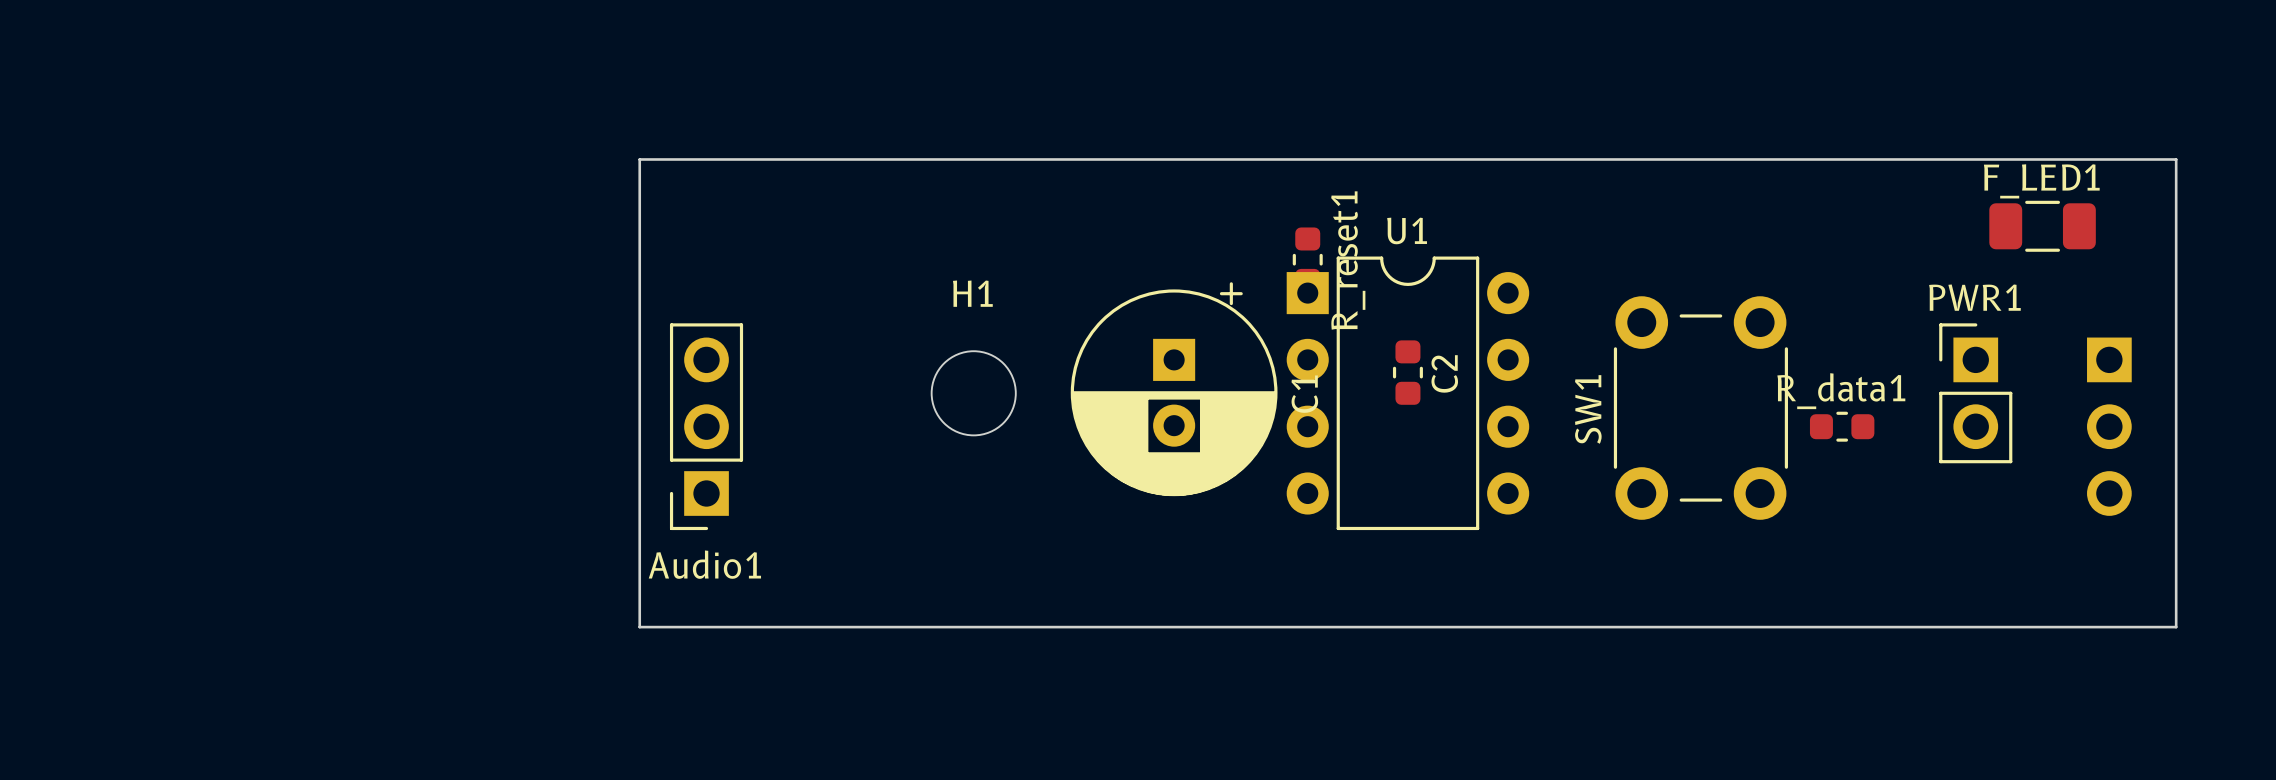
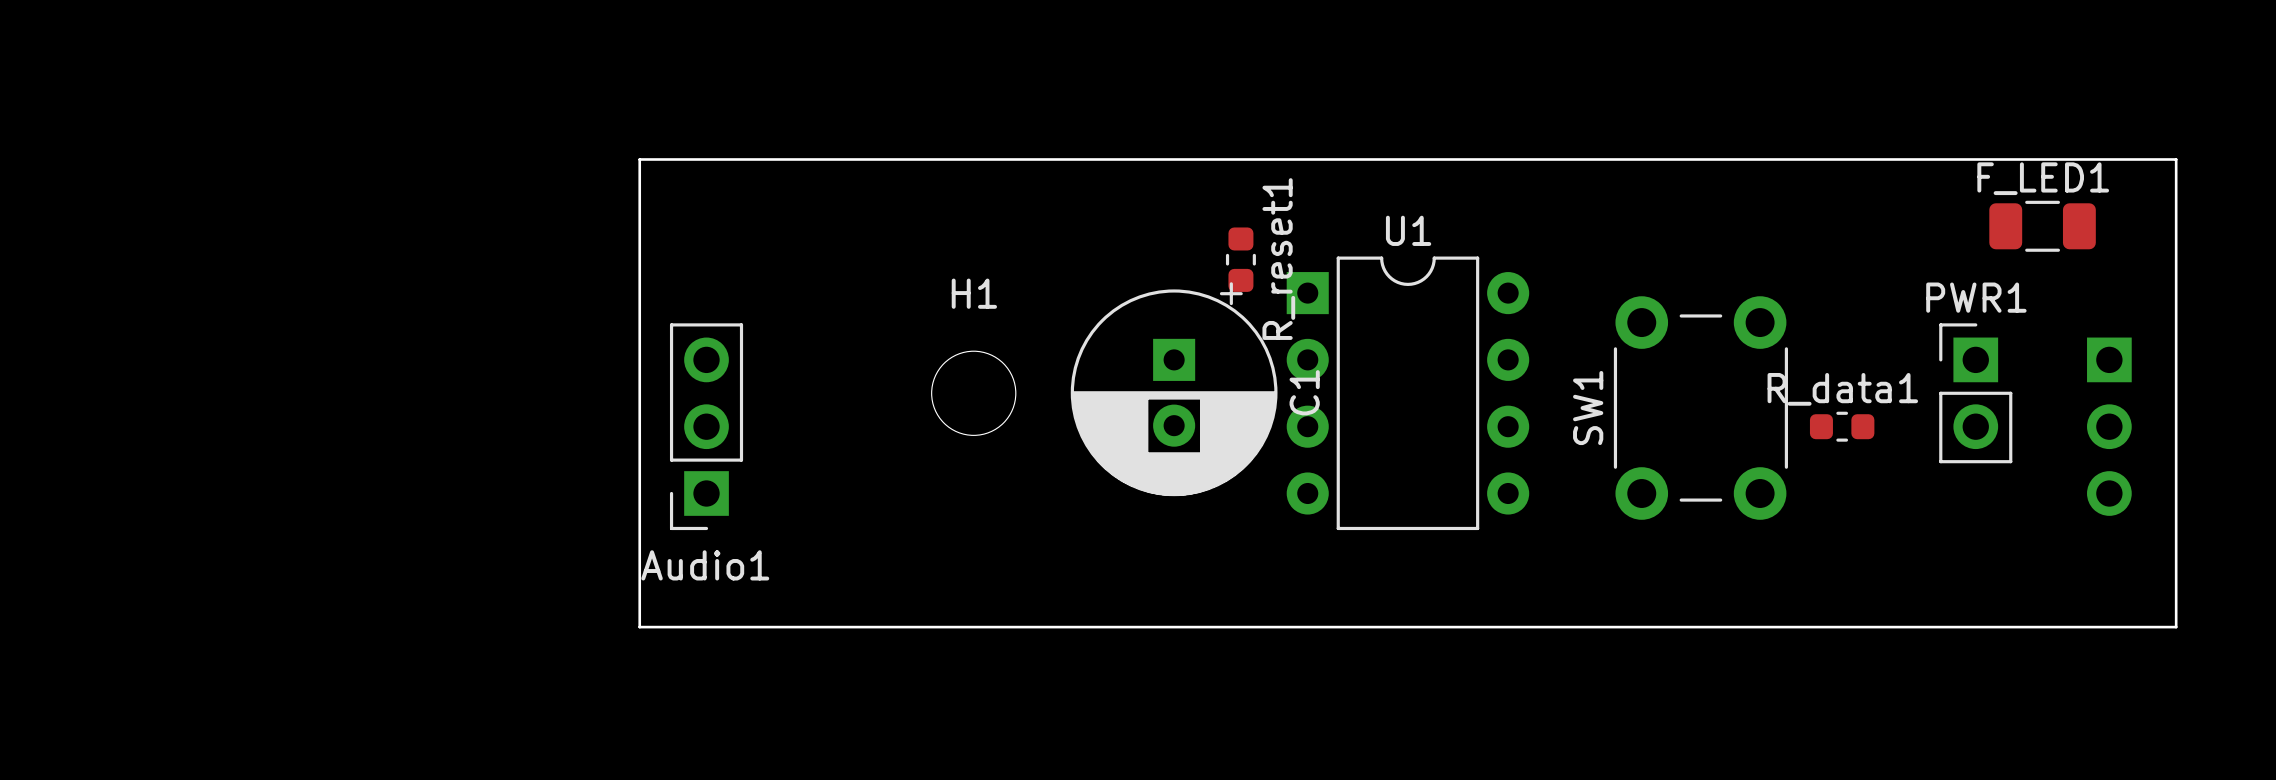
R_reset1 position: (1307, 259) -> (1240, 259)
C2: (1407, 372) -> none

